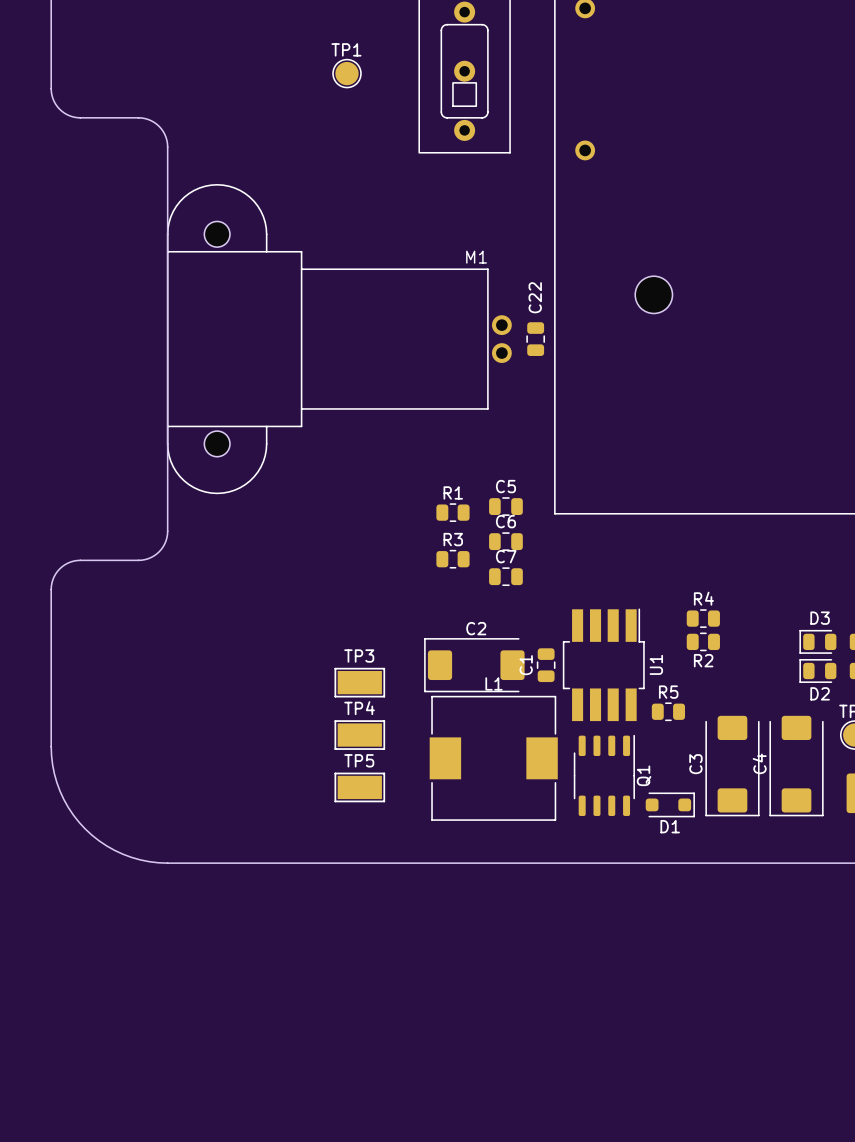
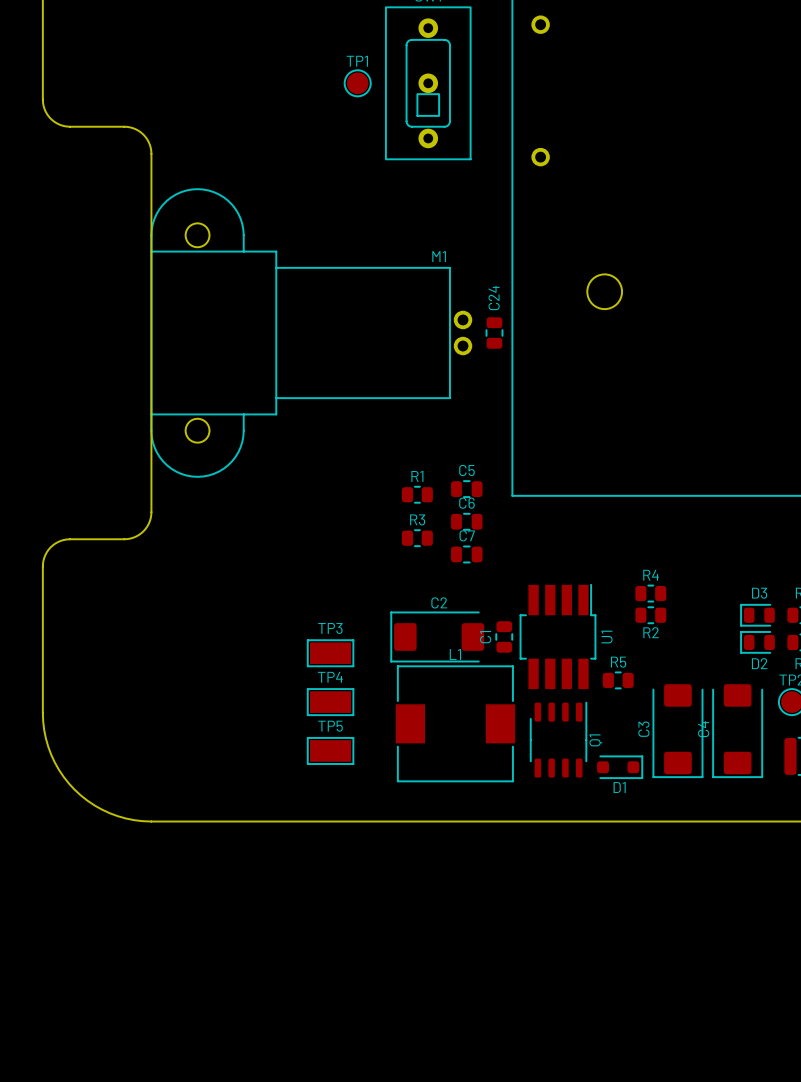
TP1 position: (347, 73) -> (357, 83)
C22 name: C22 (535, 297) -> C24 (494, 298)

